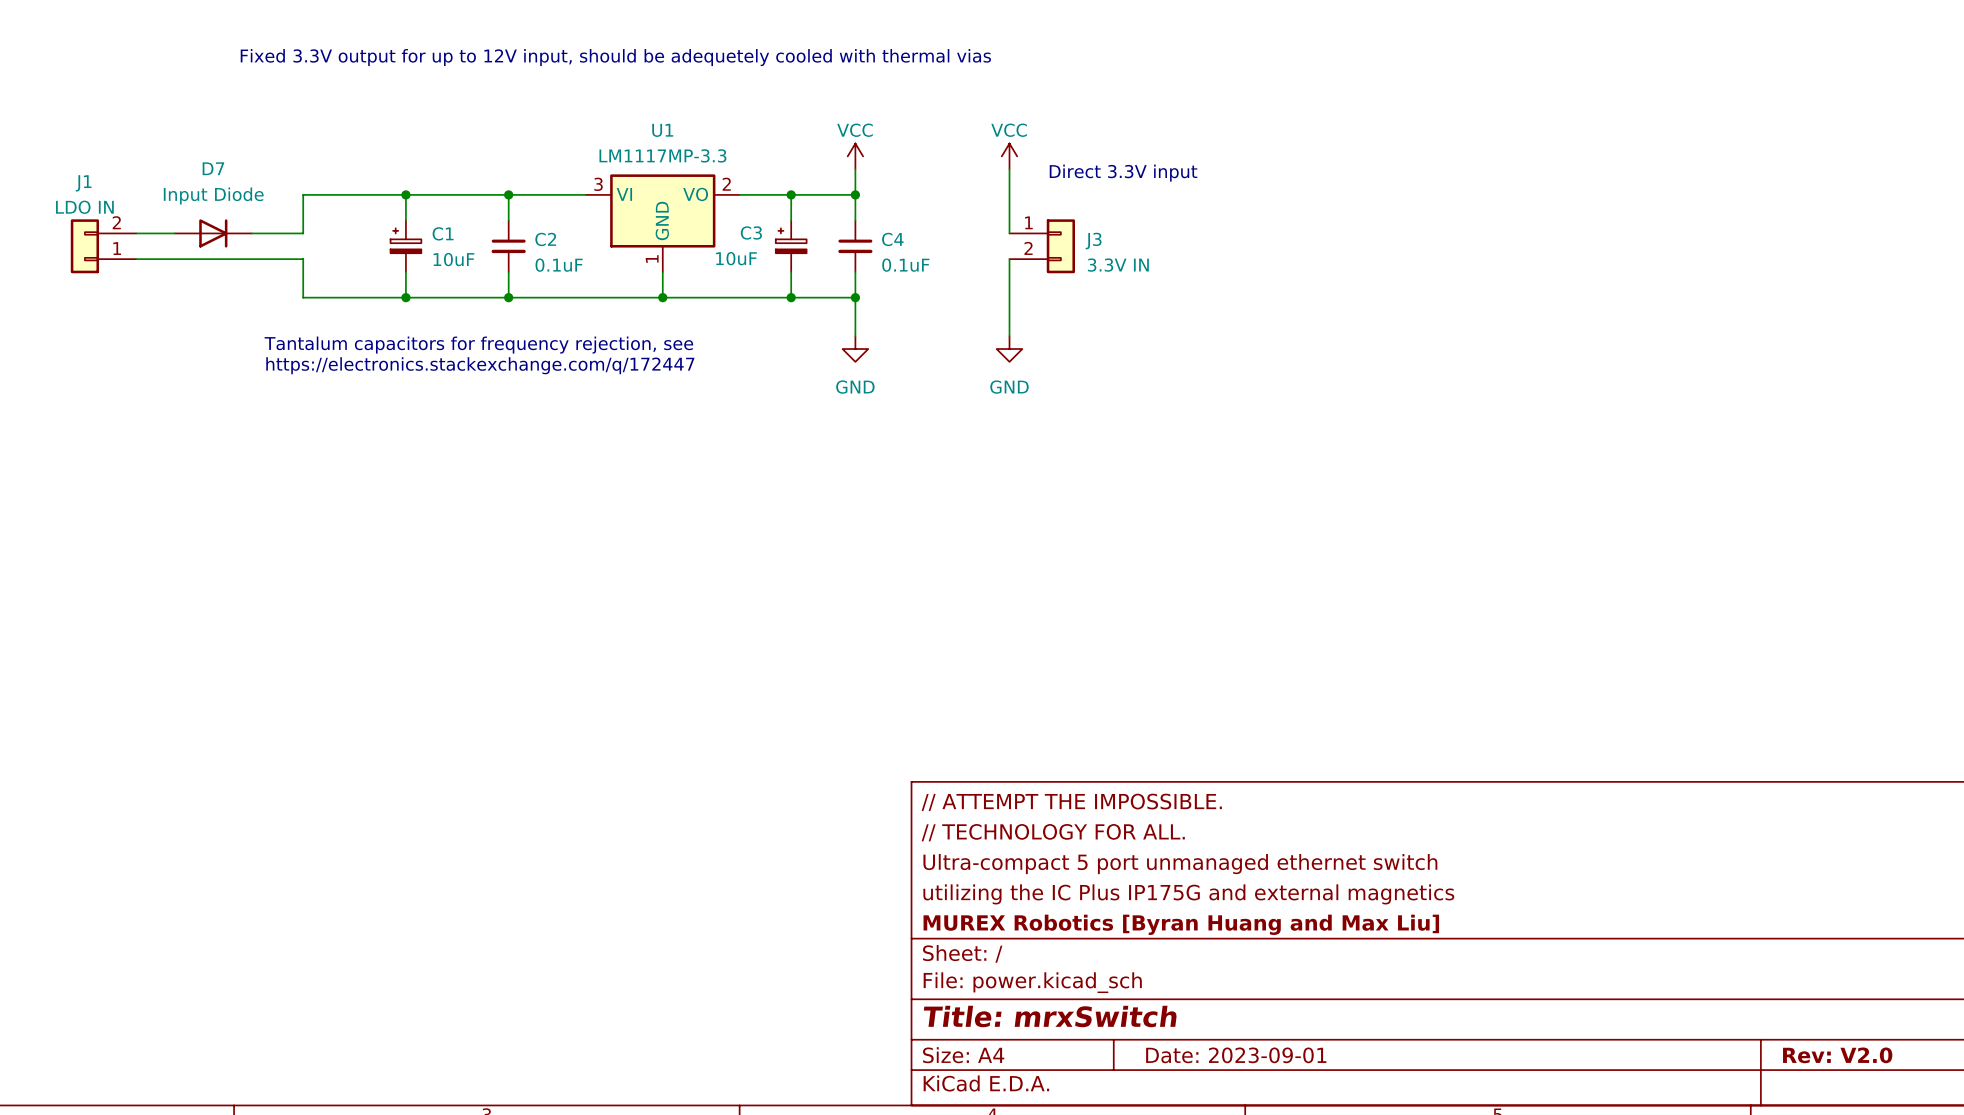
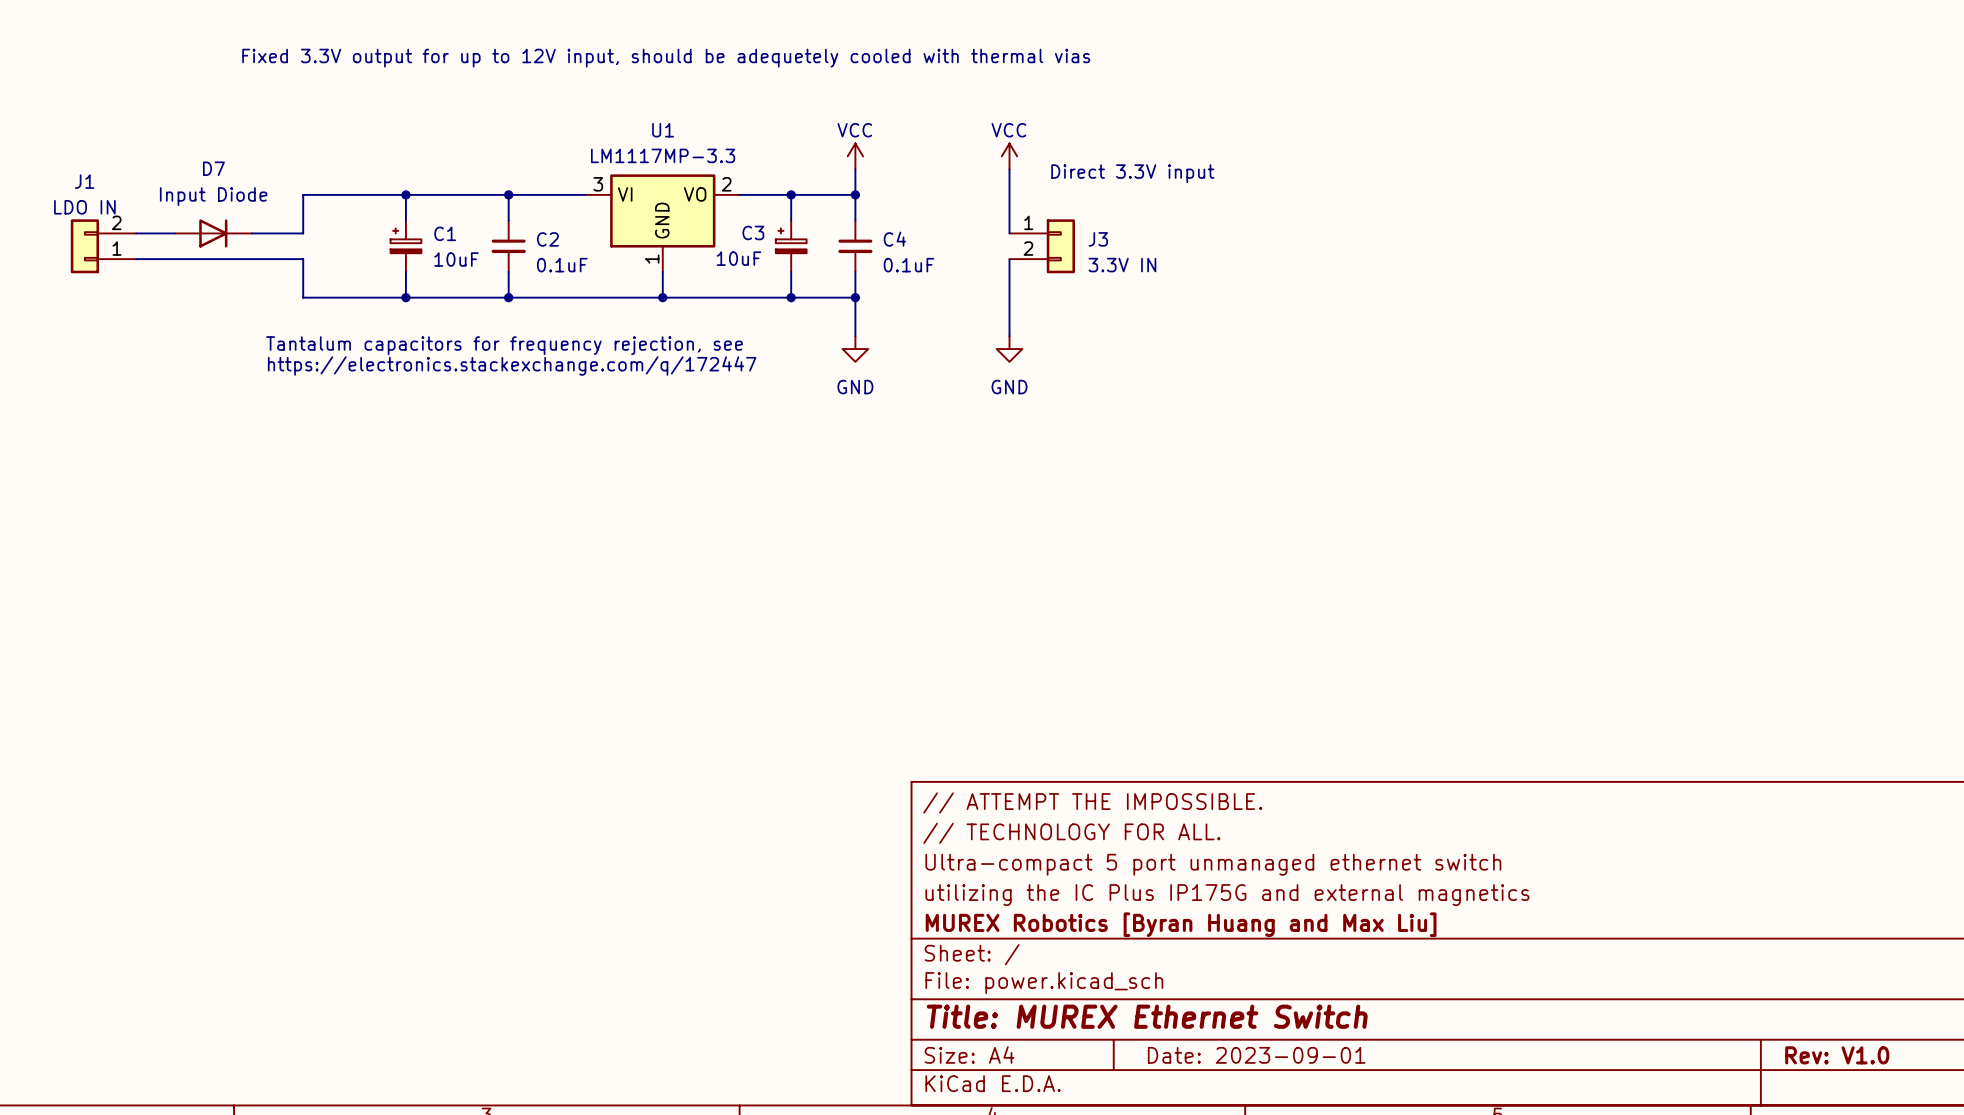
title block: Title: mrxSwitch (1050, 1016) -> Title: MUREX Ethernet Switch (1147, 1016)
title block: Rev: V2.0 (1837, 1055) -> Rev: V1.0 (1837, 1055)

